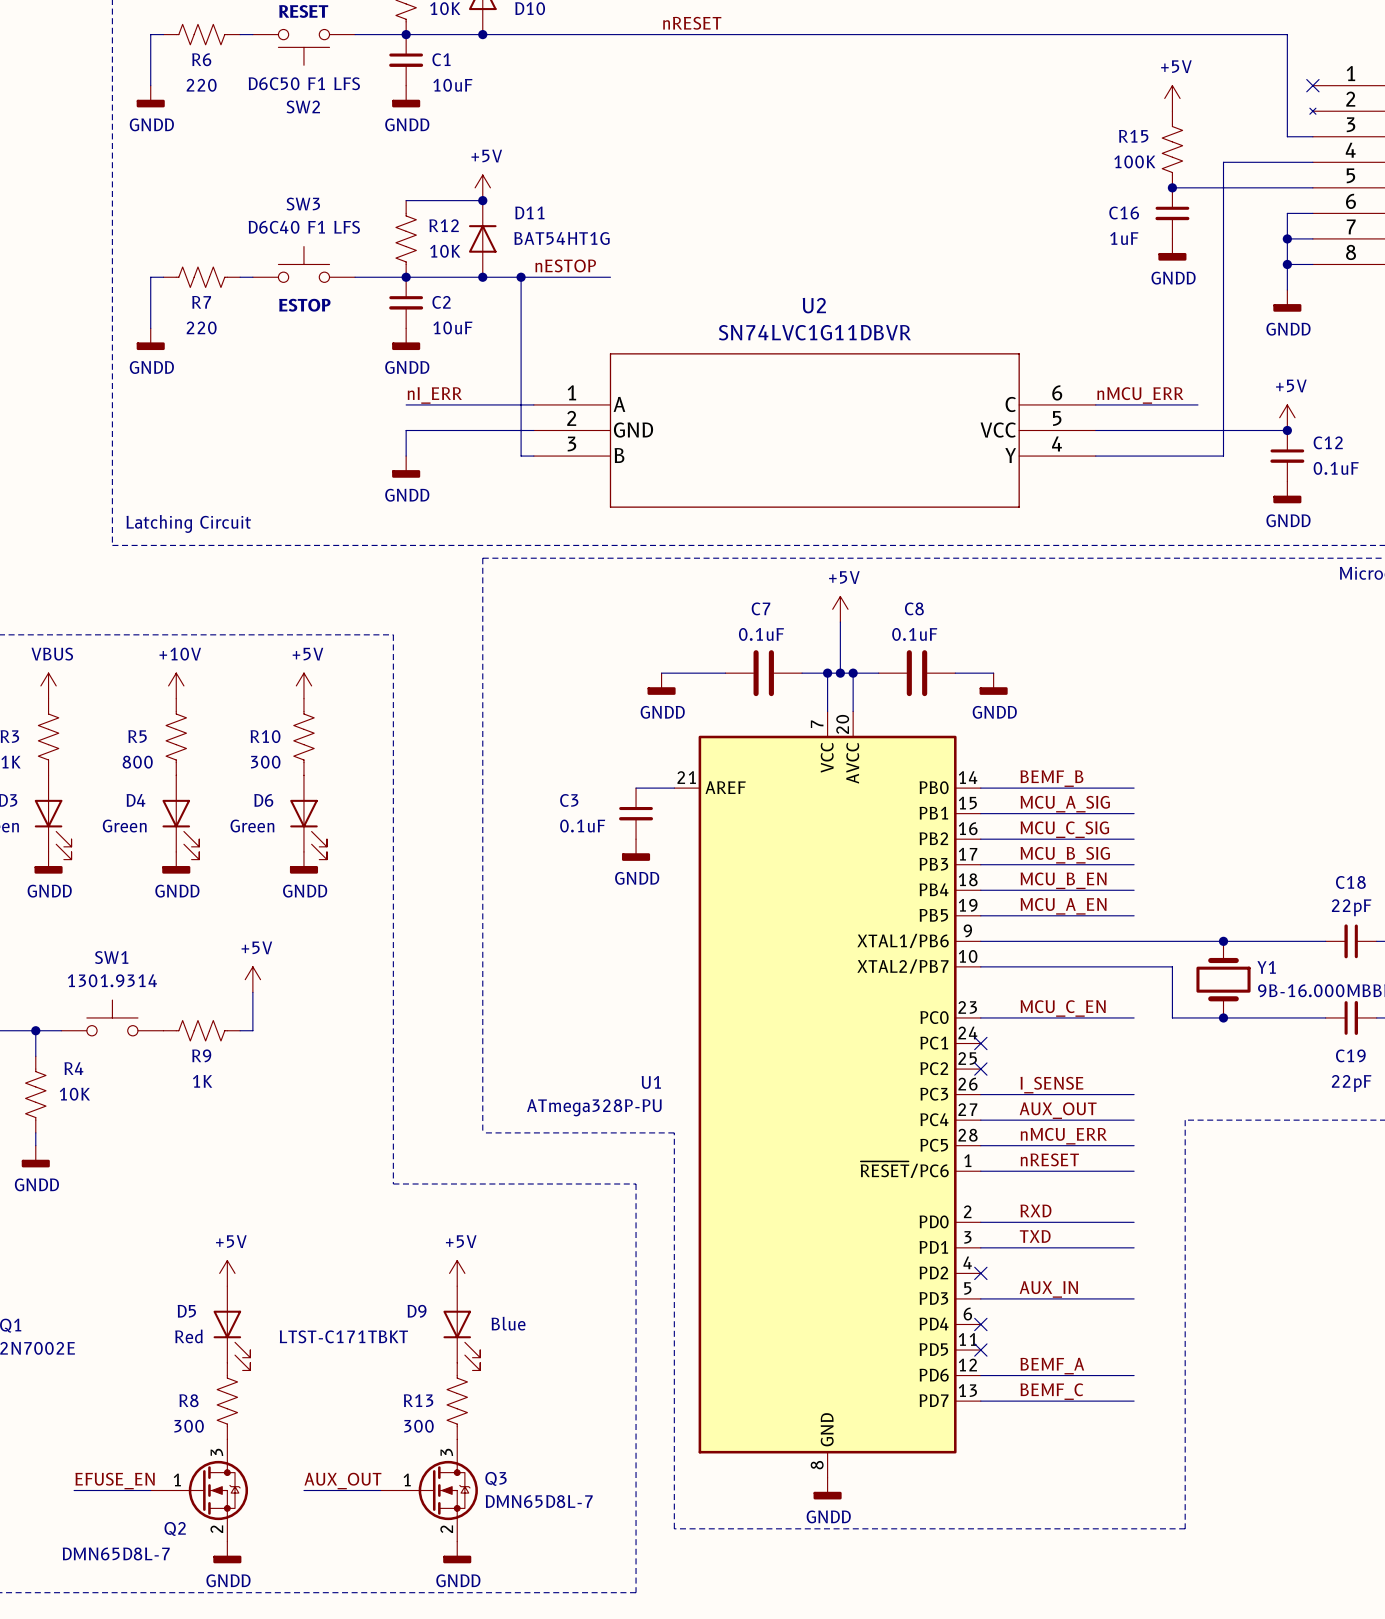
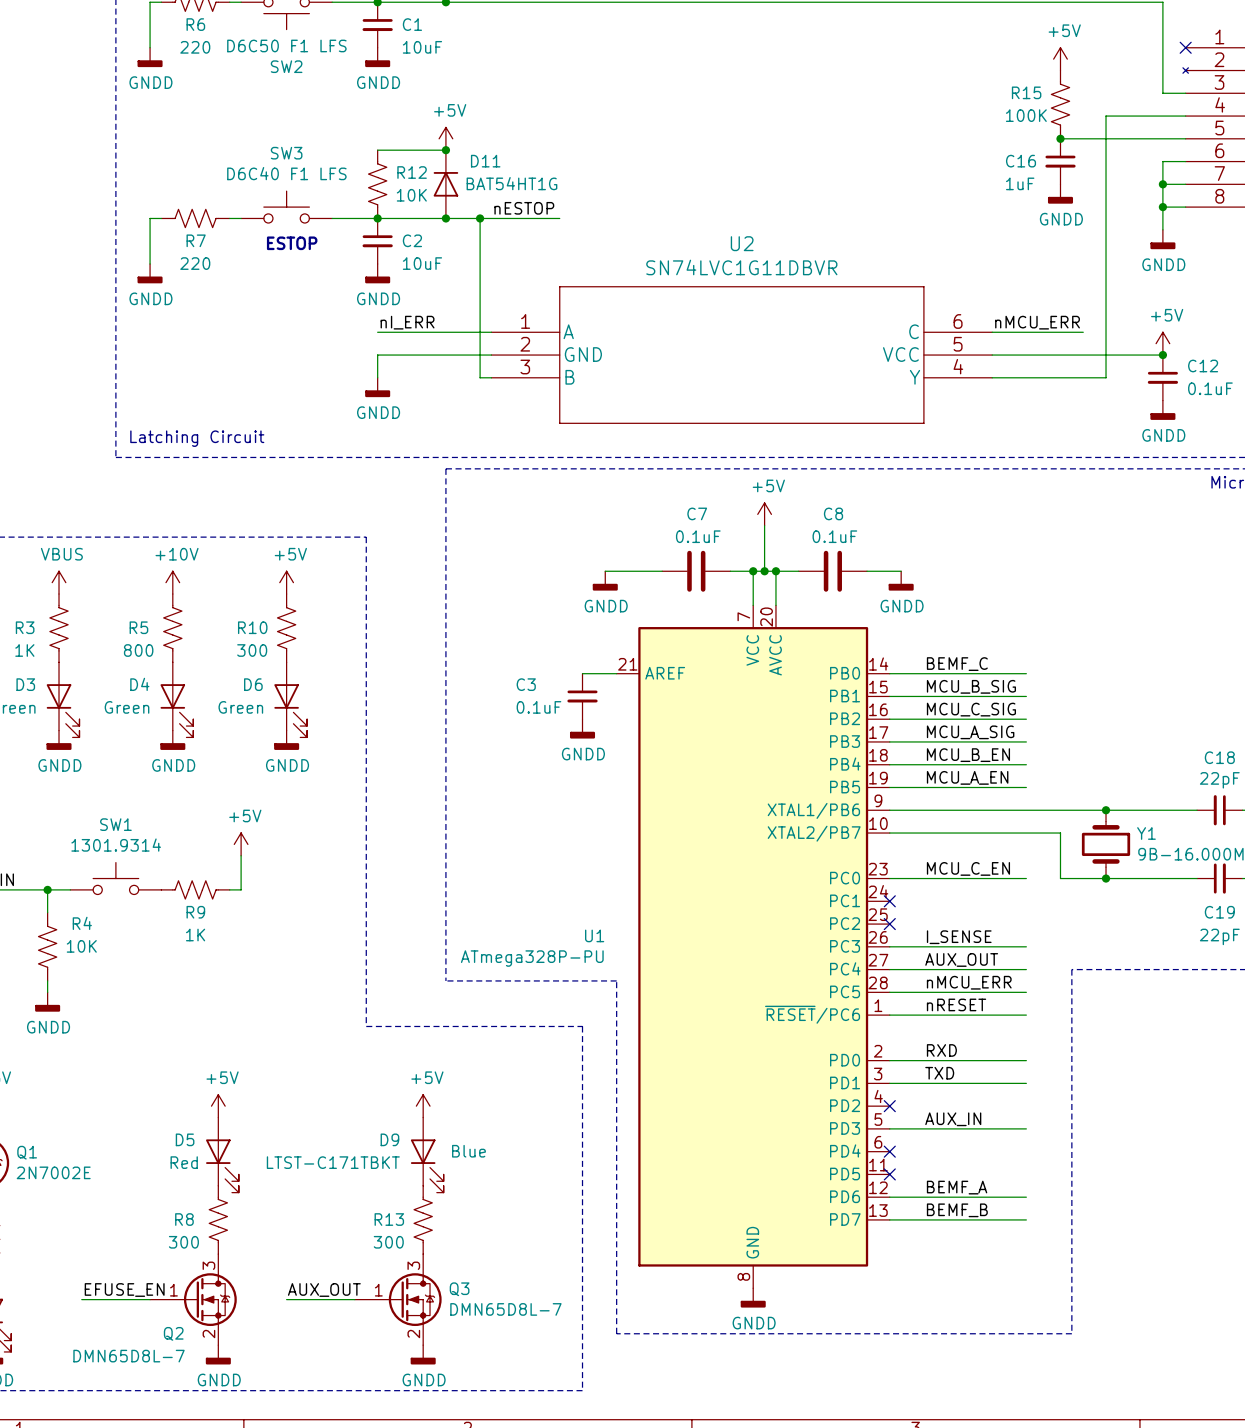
label: BEMF_B (1051, 778) -> BEMF_C (957, 664)
label: MCU_A_SIG (1065, 804) -> MCU_B_SIG (971, 686)
label: MCU_B_SIG (1065, 855) -> MCU_A_SIG (970, 732)
label: BEMF_C (1051, 1391) -> BEMF_B (957, 1210)

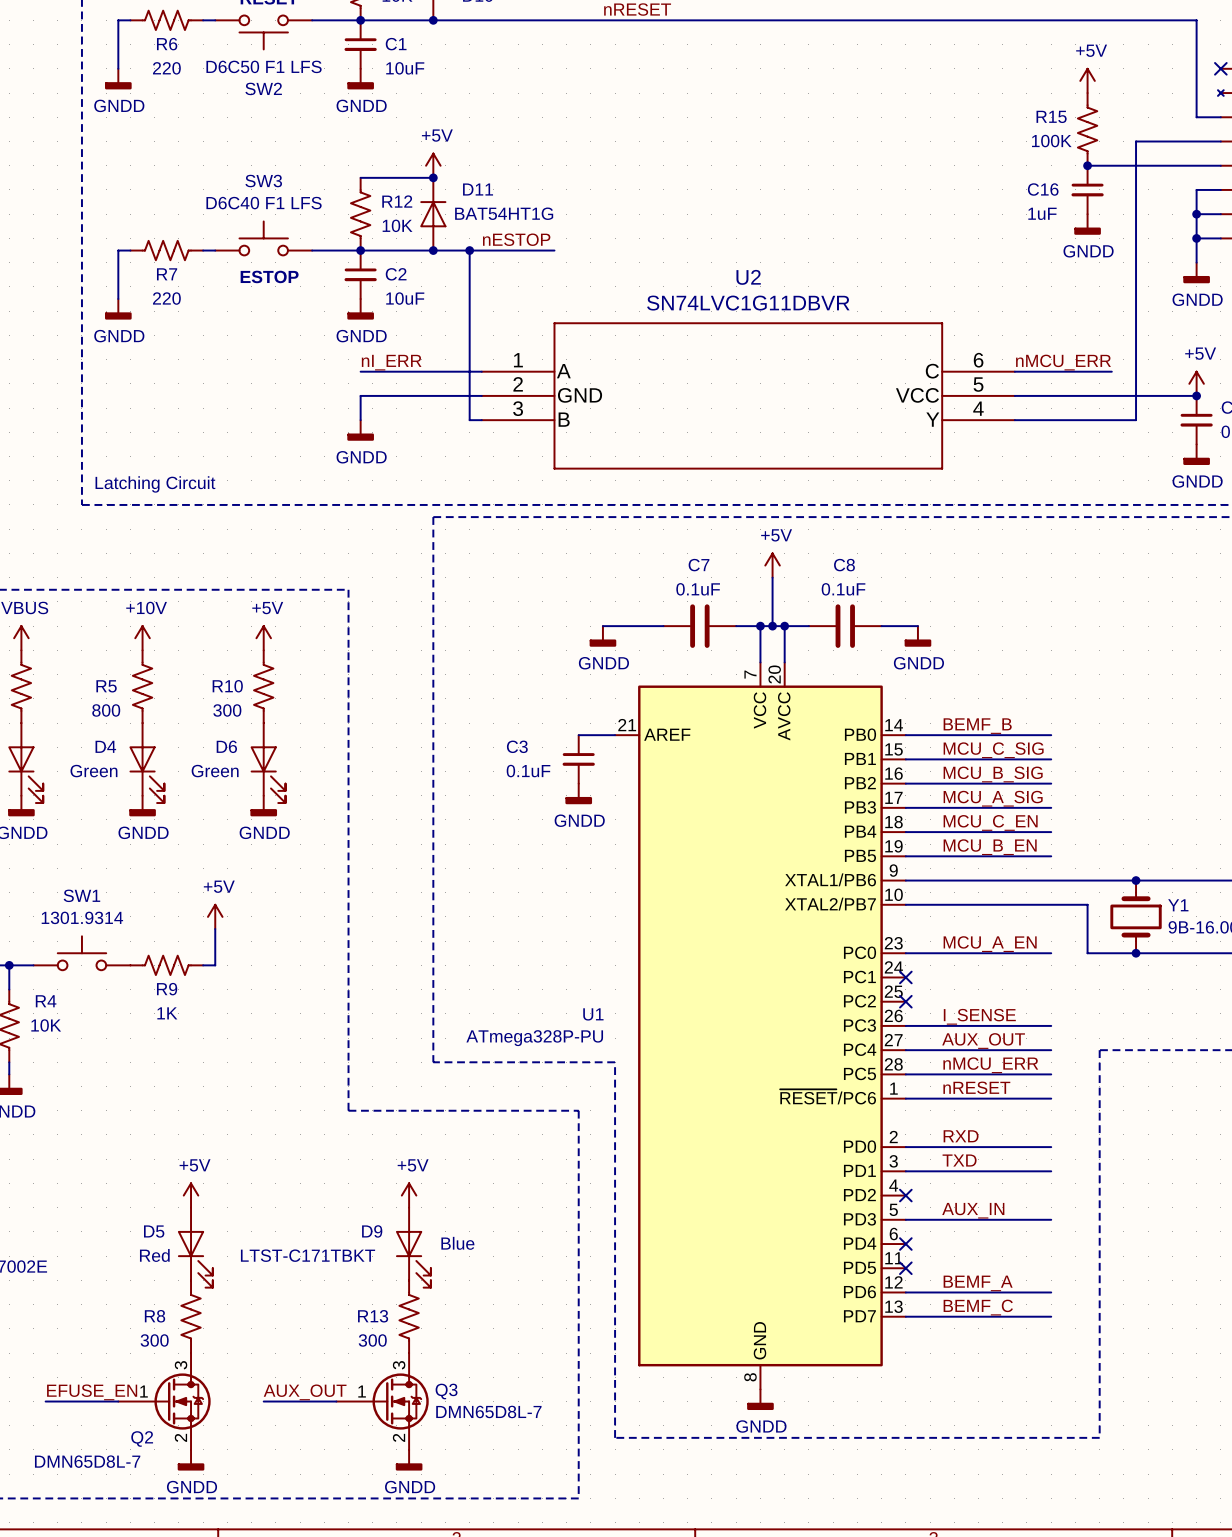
label: BEMF_C (957, 664) -> BEMF_B (977, 726)
label: MCU_B_SIG (971, 686) -> MCU_C_SIG (993, 750)
label: MCU_C_SIG (971, 709) -> MCU_B_SIG (993, 774)
label: MCU_B_EN (968, 755) -> MCU_C_EN (990, 822)
label: MCU_A_EN (967, 777) -> MCU_B_EN (990, 847)
label: MCU_C_EN (968, 868) -> MCU_A_EN (990, 944)
label: BEMF_B (957, 1210) -> BEMF_C (978, 1307)

